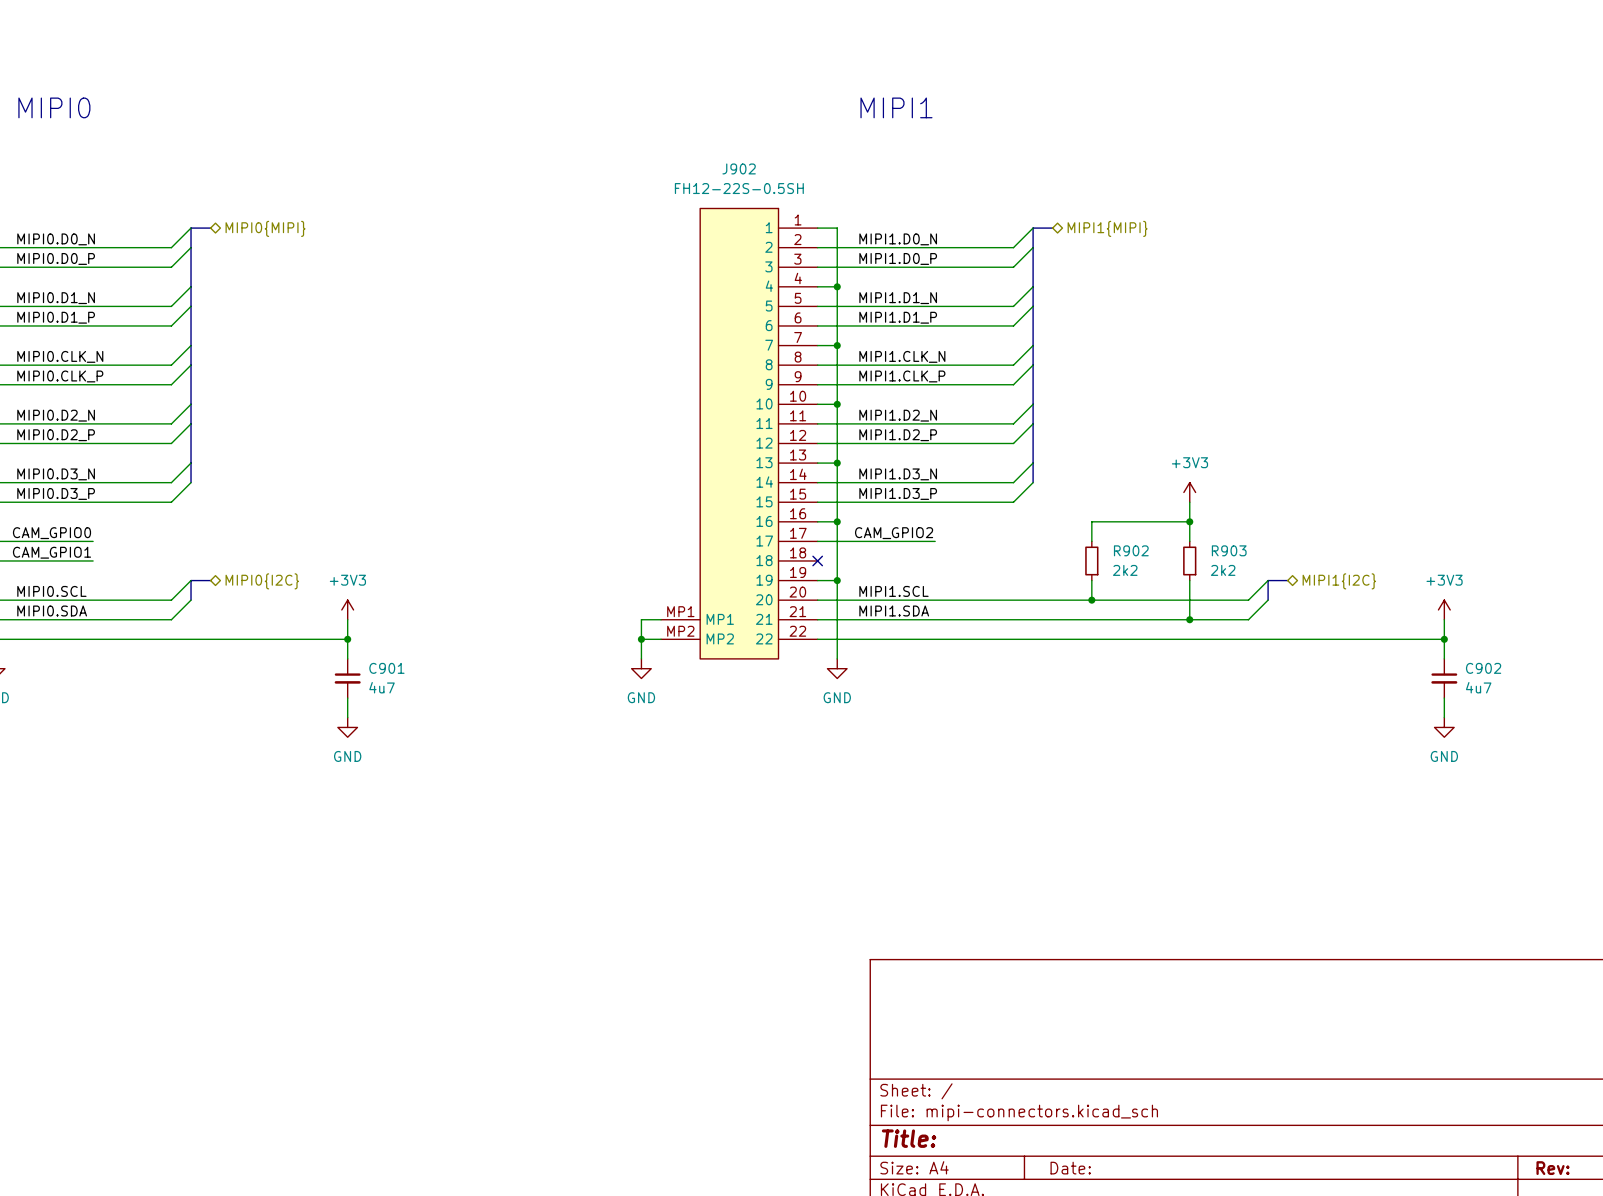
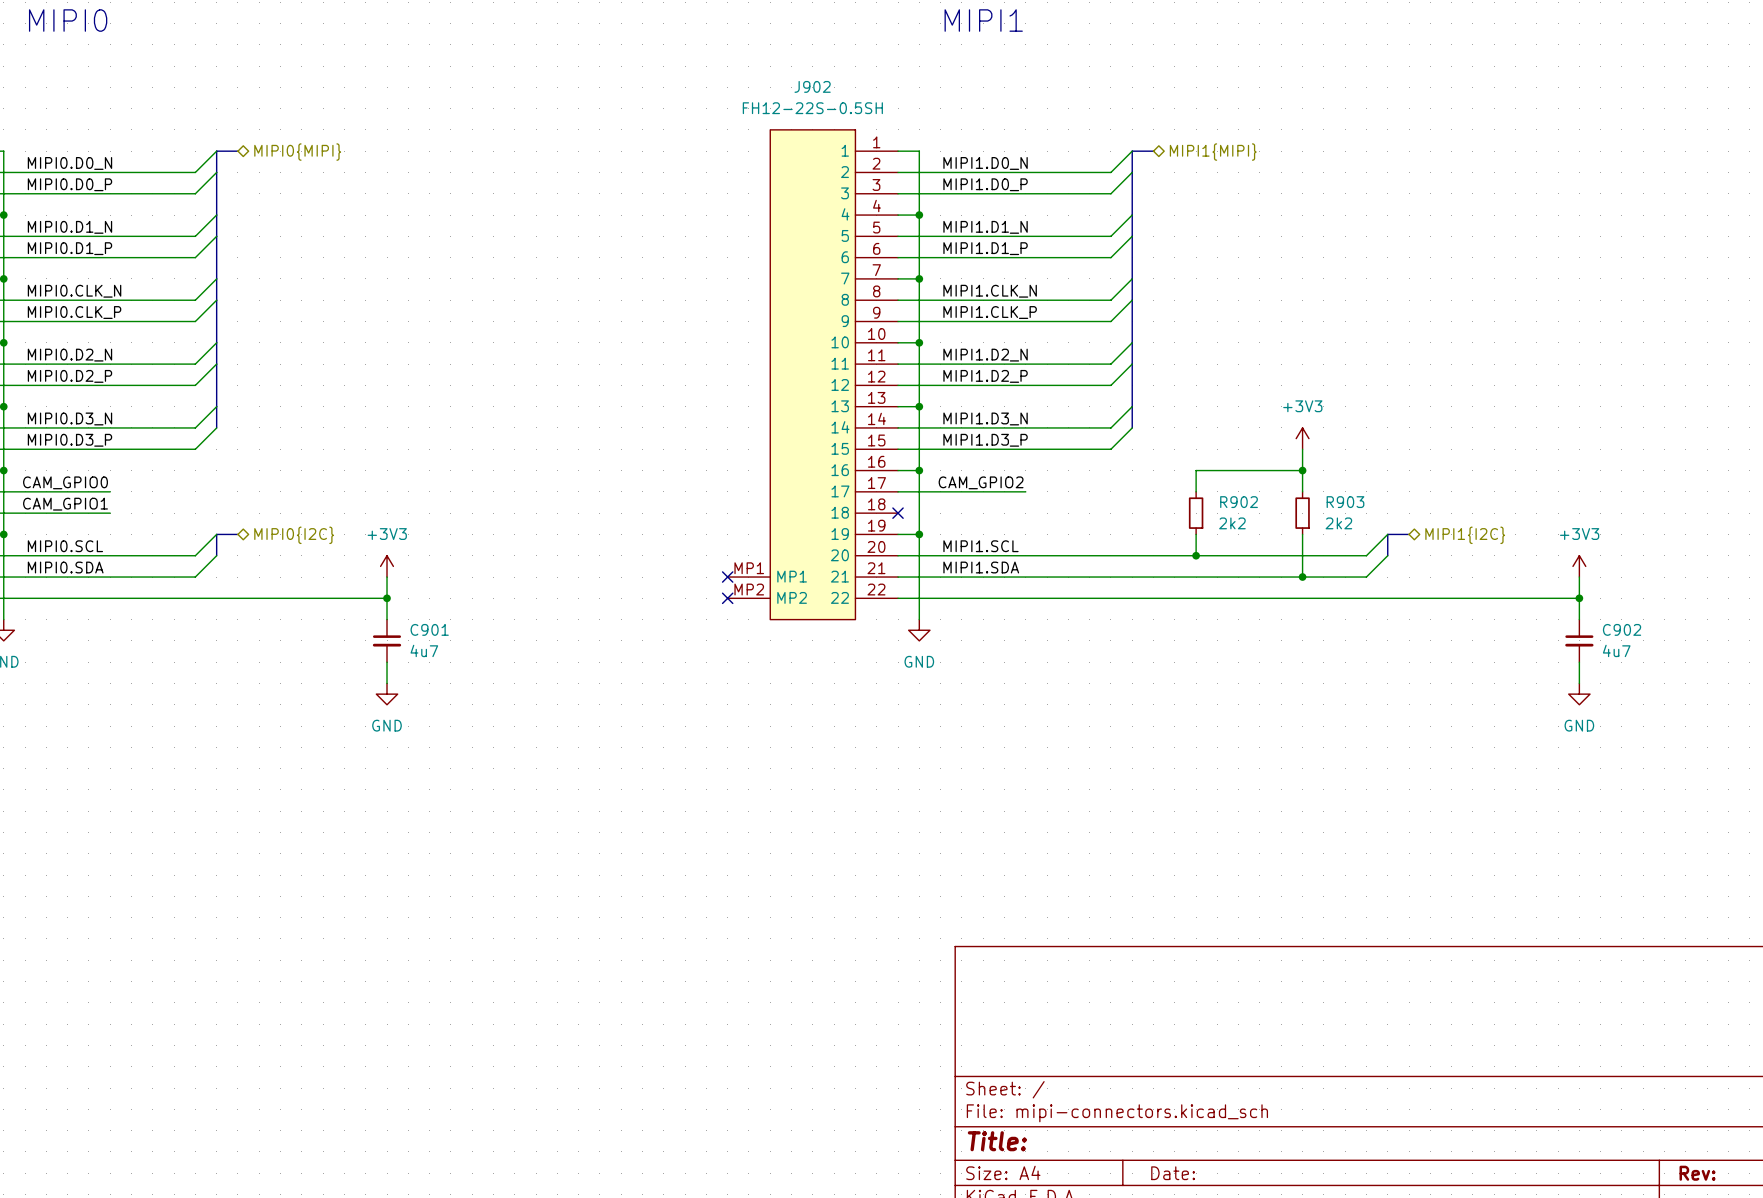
wire: (661, 619) (641, 619) (641, 658) -> none
no-connect mark: none -> (727, 577)
wire: (641, 639) (661, 639) -> none
junction: (641, 639) -> none
no-connect mark: none -> (727, 598)
power symbol: GND (641, 668) -> none

